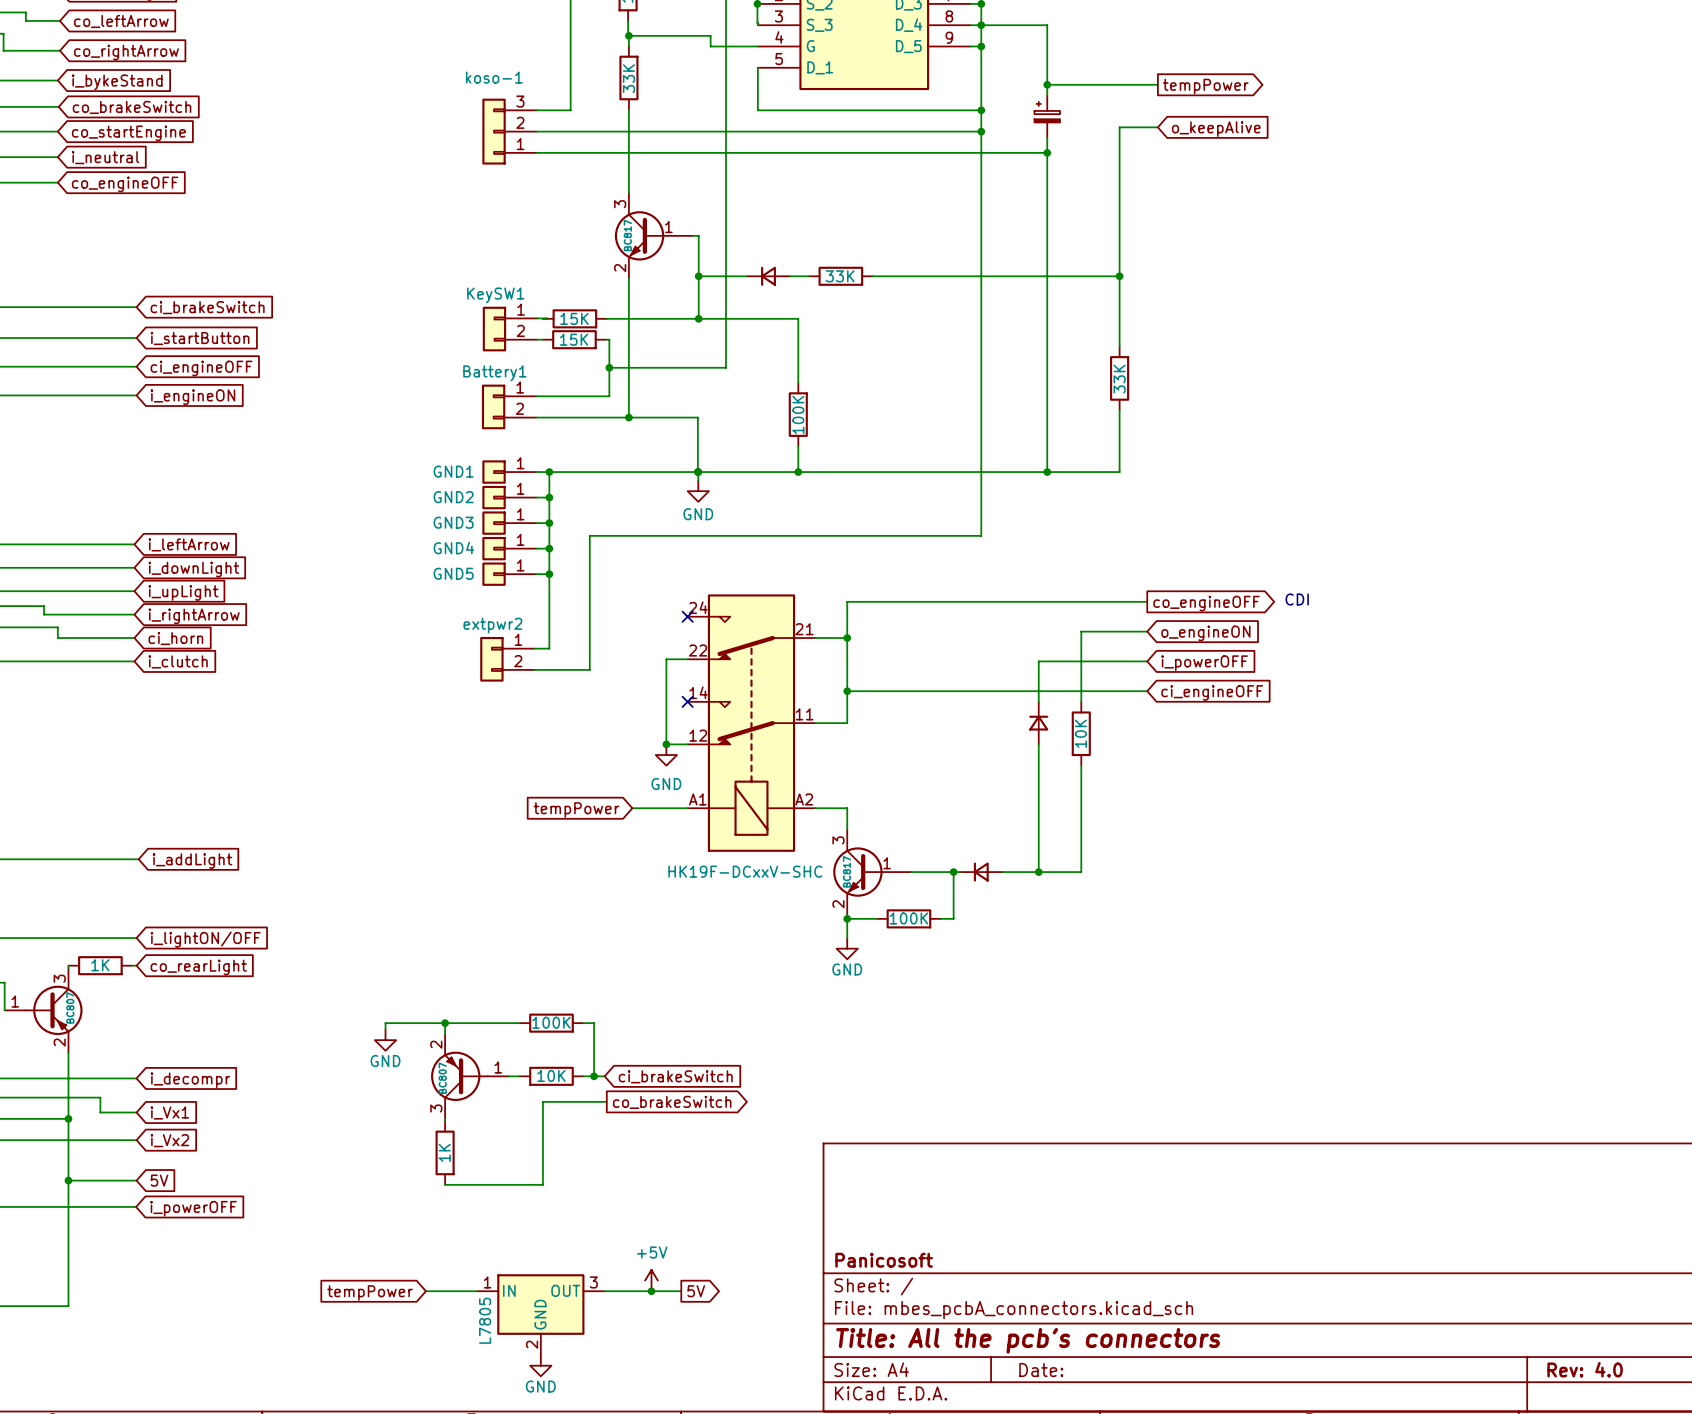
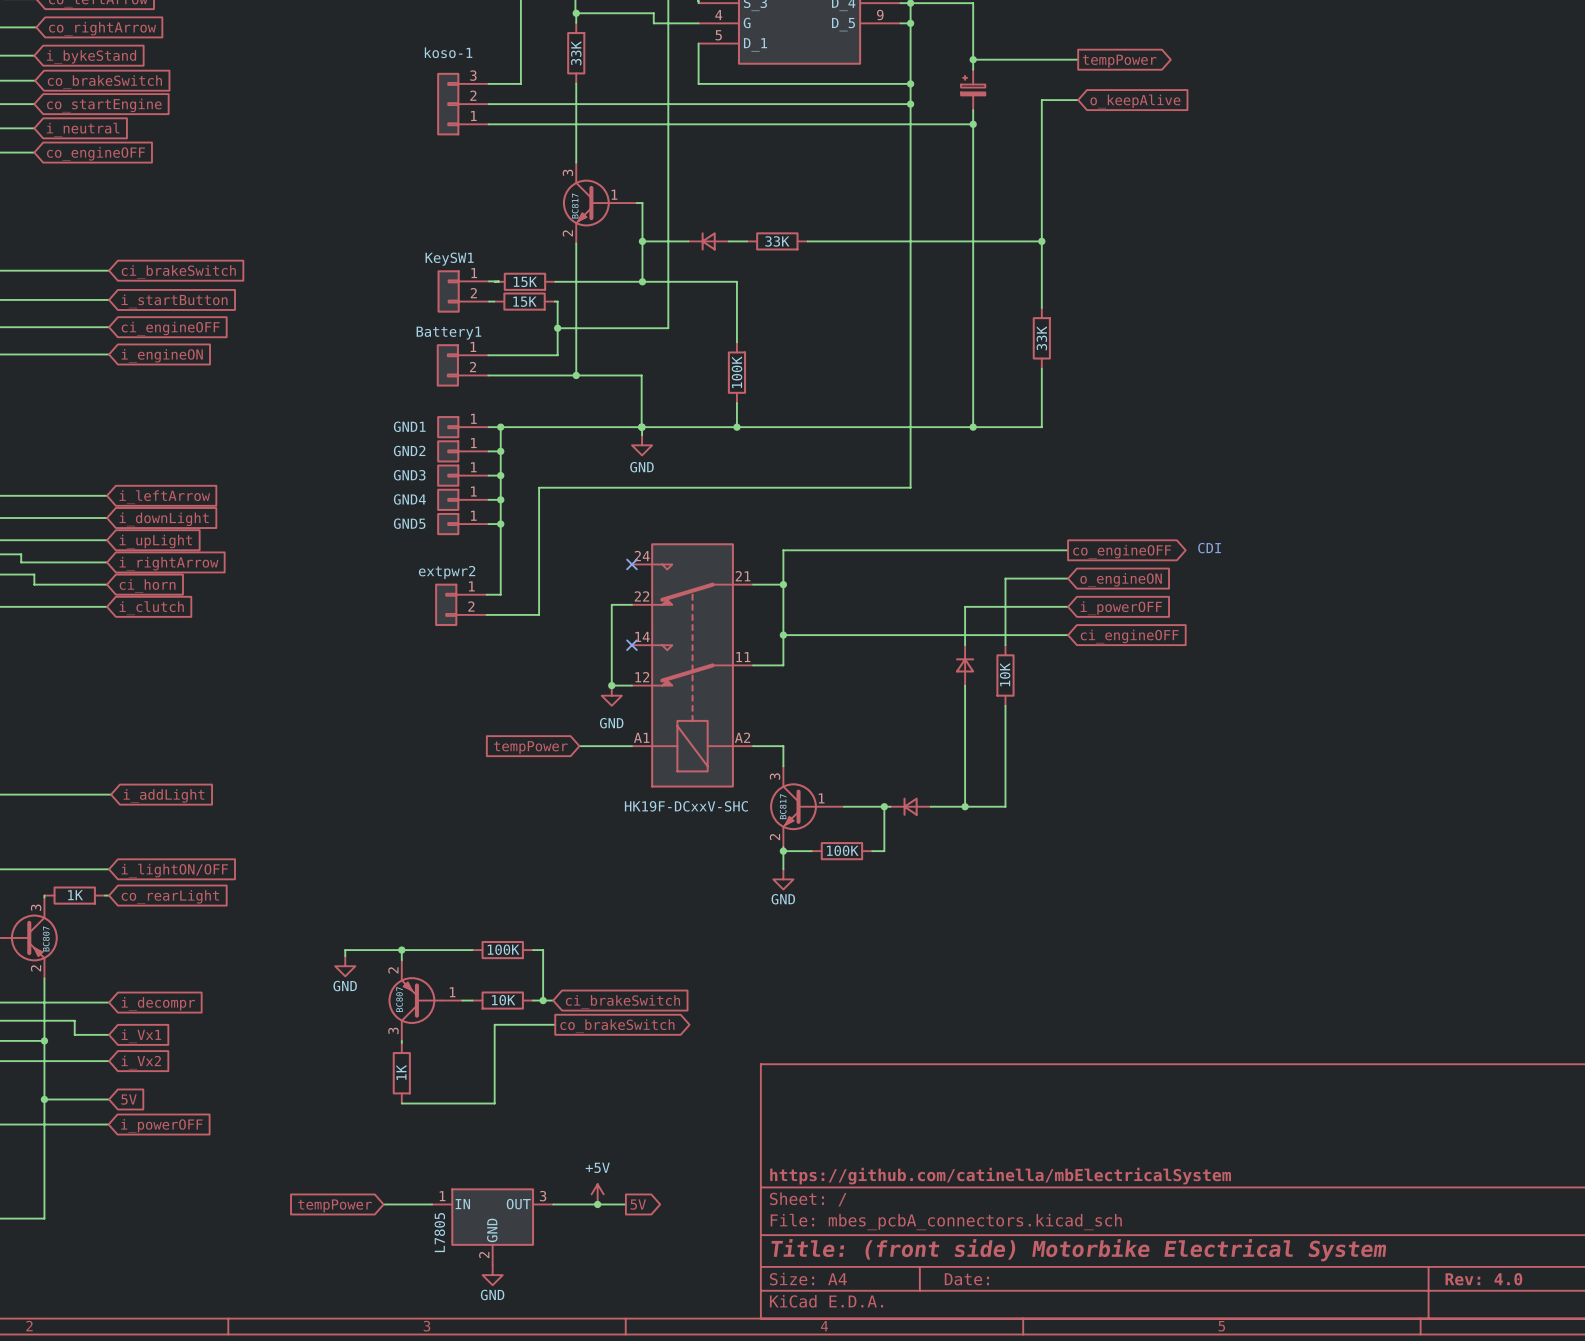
title block: Panicosoft (884, 1260) -> https://github.com/catinella/mbElectricalSystem (1000, 1176)
title block: Title: All the pcb's connectors (1028, 1340) -> Title: (front side) Motorbike Electrical System (1078, 1250)

